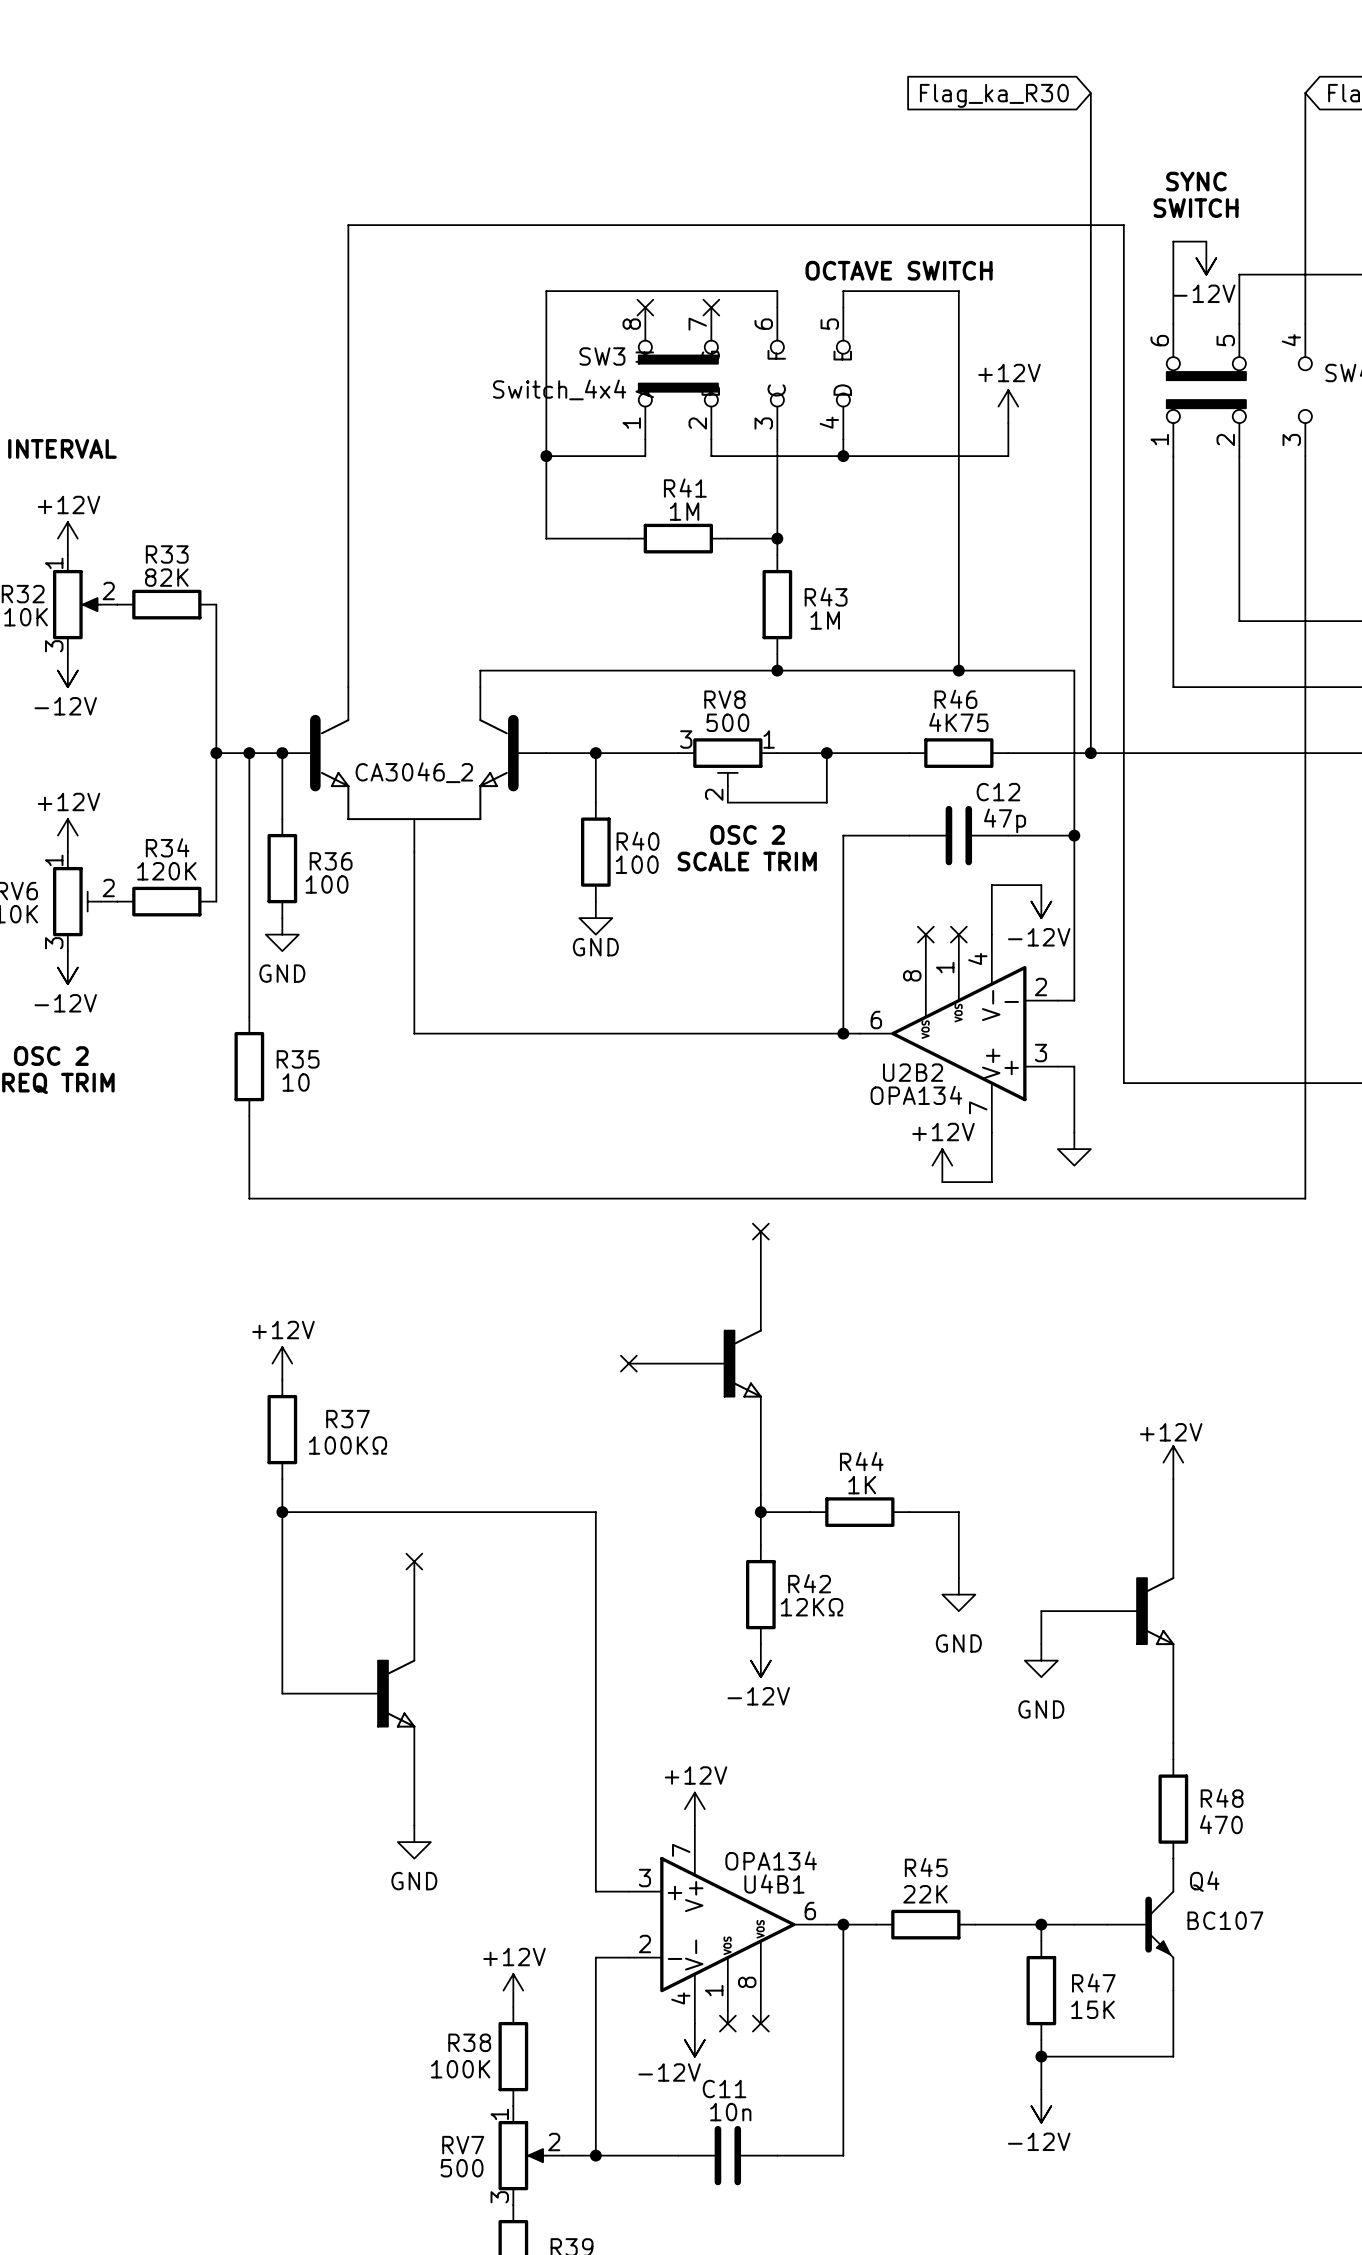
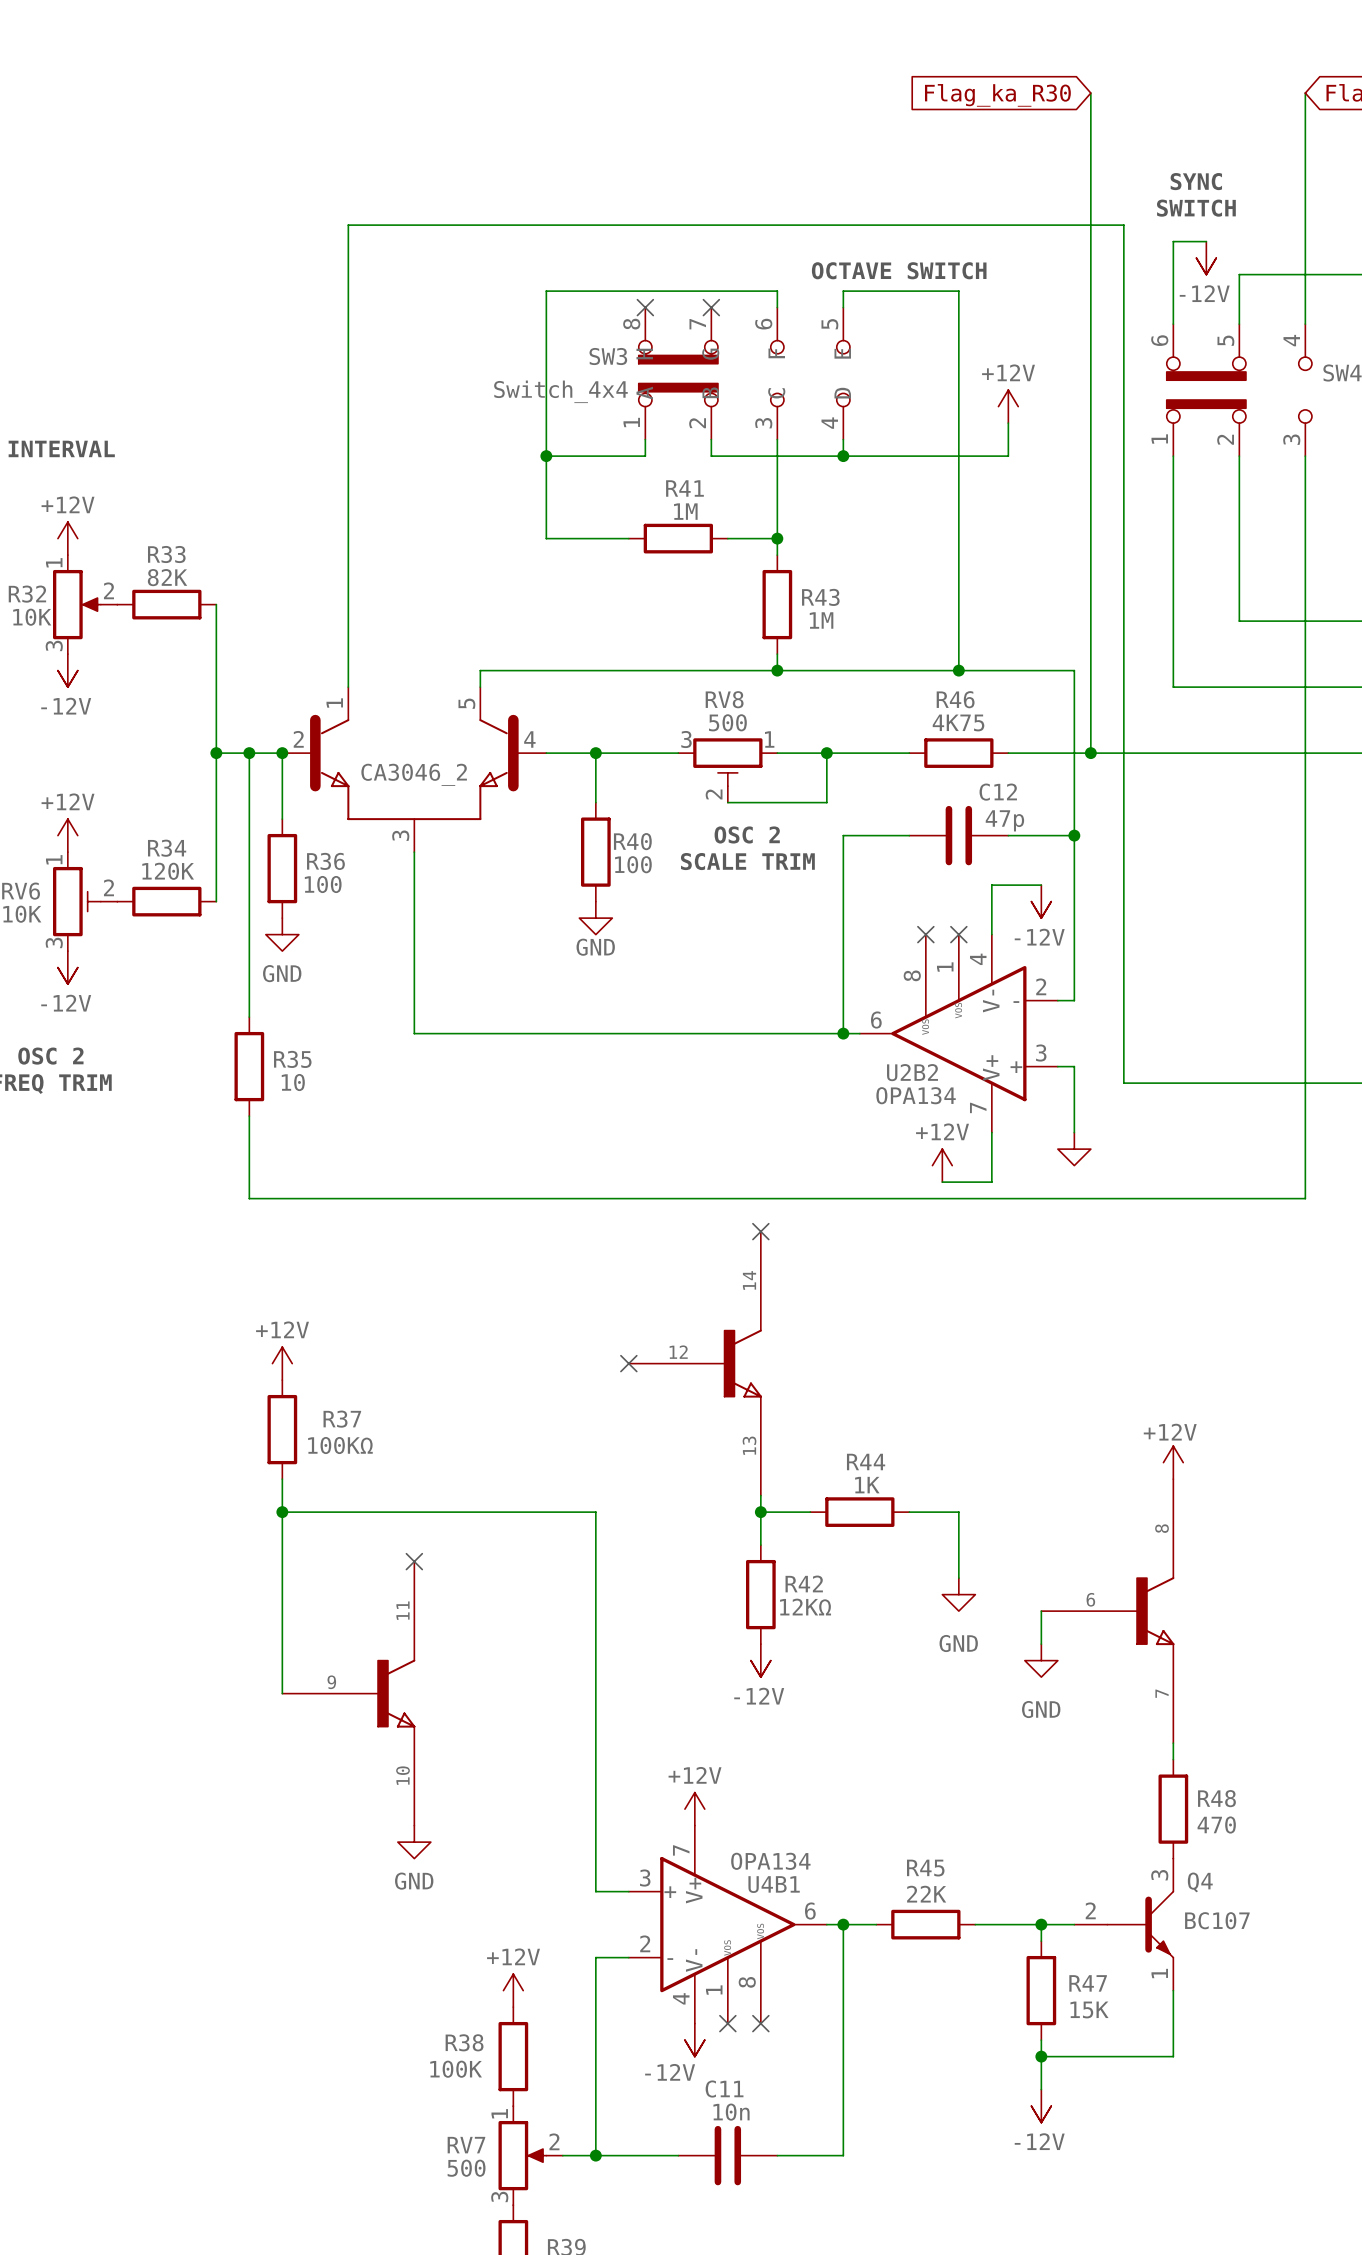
CA3046_2 symbol: [282, 687, 1175, 1826] -> [282, 687, 1175, 1826]
Q4 pin number: none -> 3 (1159, 1875)
Q4 pin number: none -> 2 (1090, 1910)
Q4 pin number: none -> 1 (1159, 1973)

